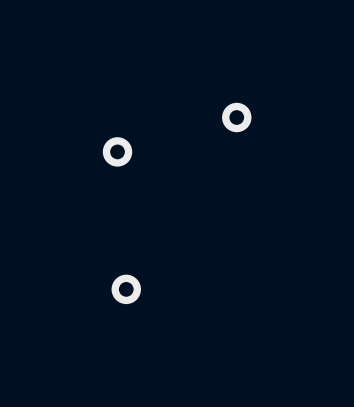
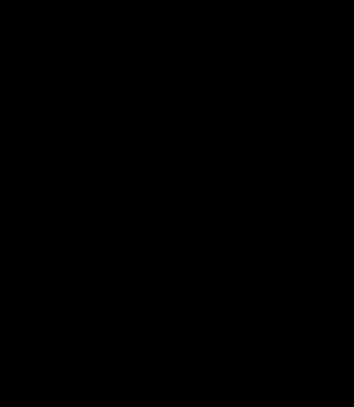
via: (236, 117) -> none
via: (117, 151) -> none
via: (126, 289) -> none

